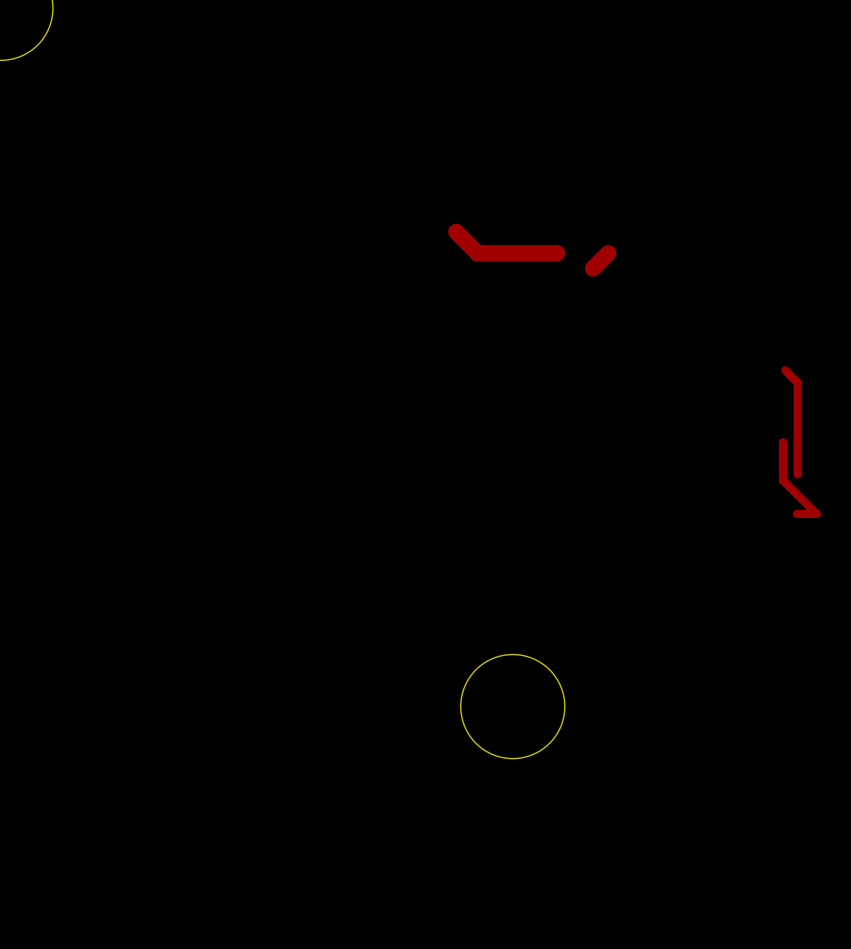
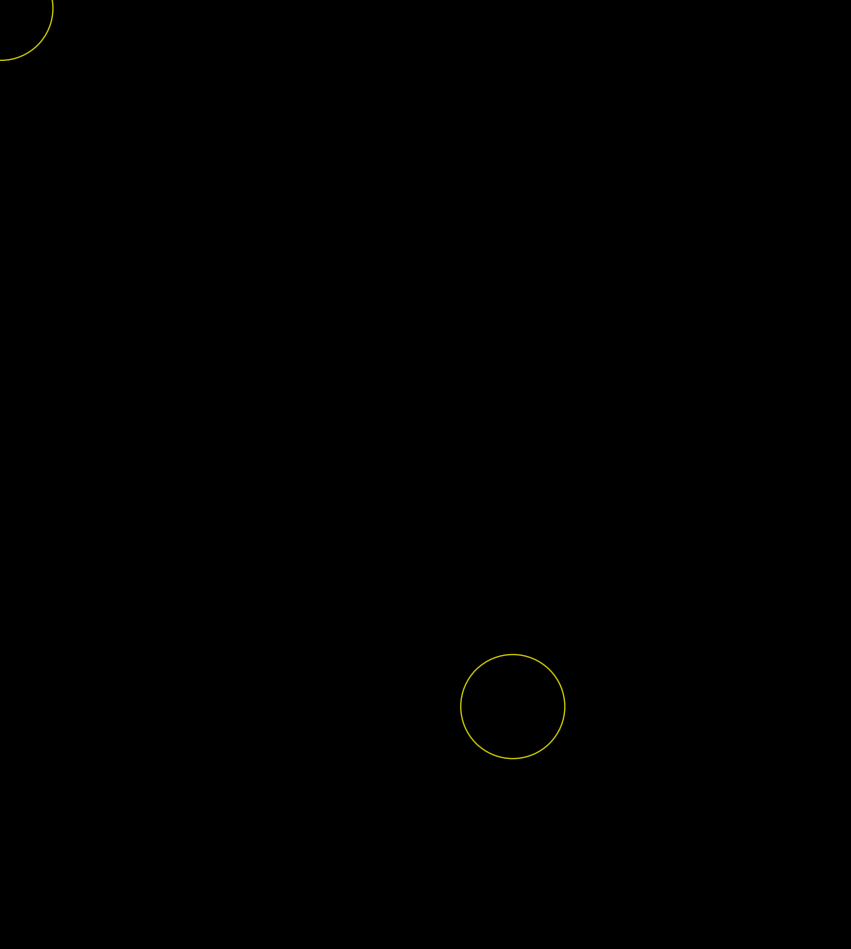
top track: (456, 231) (477, 253) (557, 253) -> none
top track: (608, 253) (593, 268) -> none
top track: (785, 370) (797, 382) (797, 474) -> none
top track: (783, 442) (783, 480) (816, 513) (797, 513) -> none

